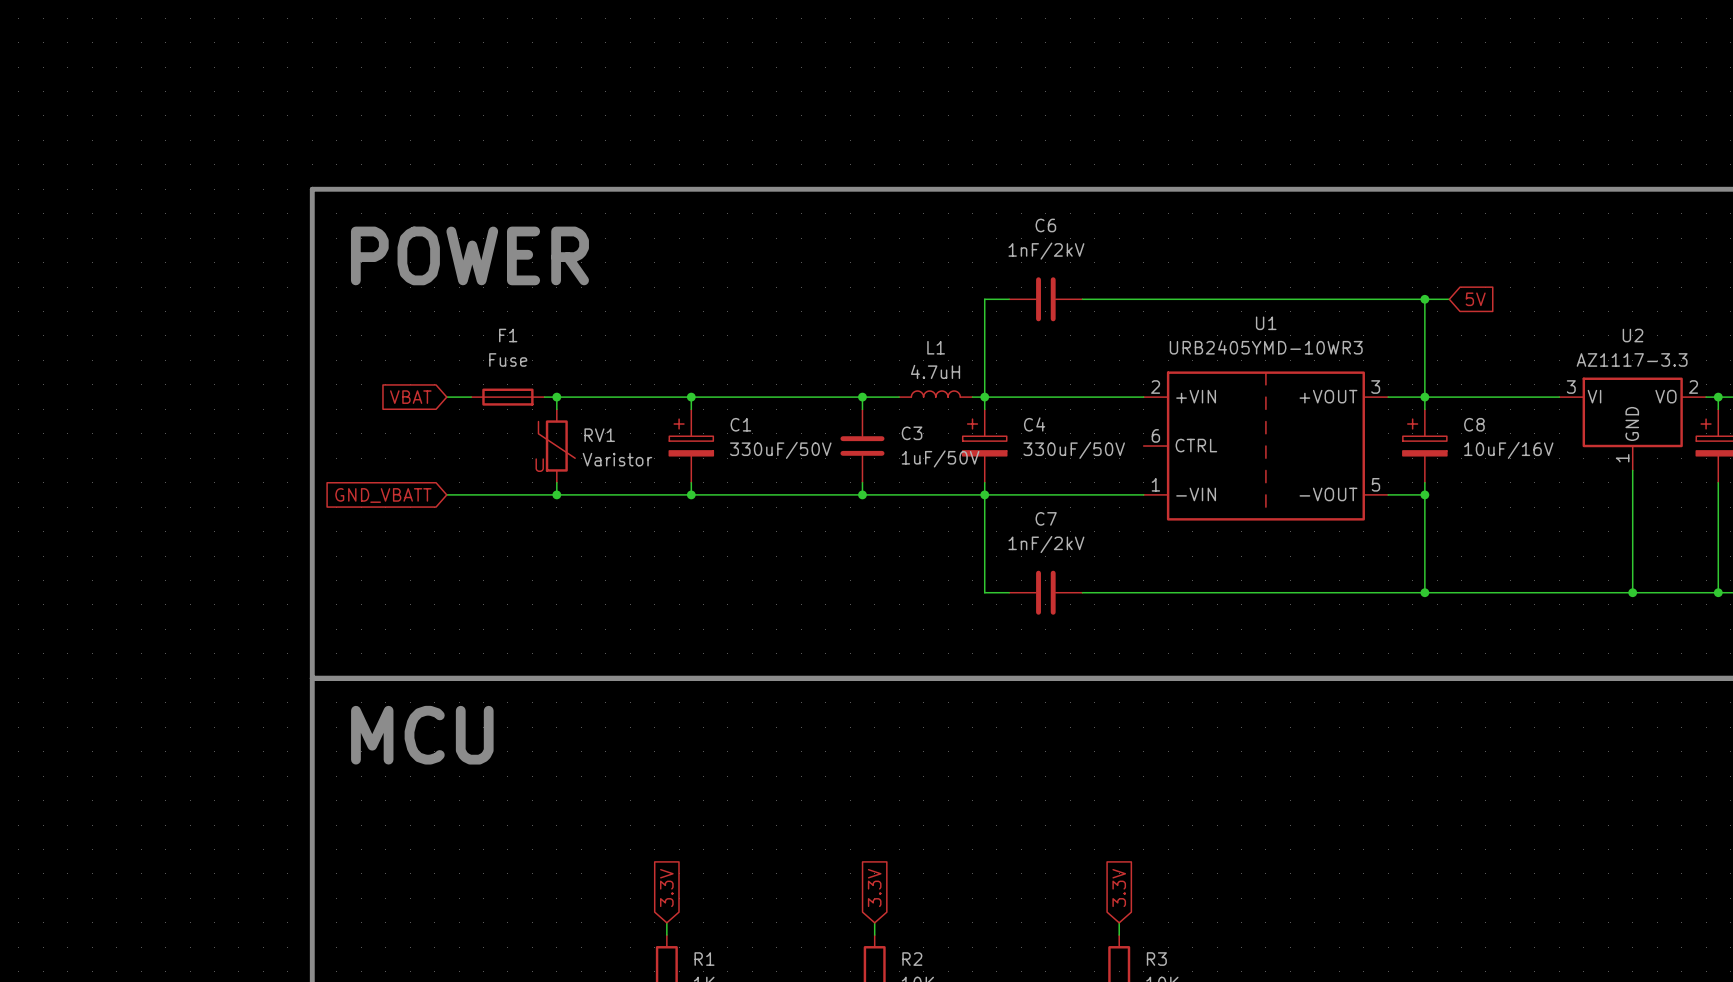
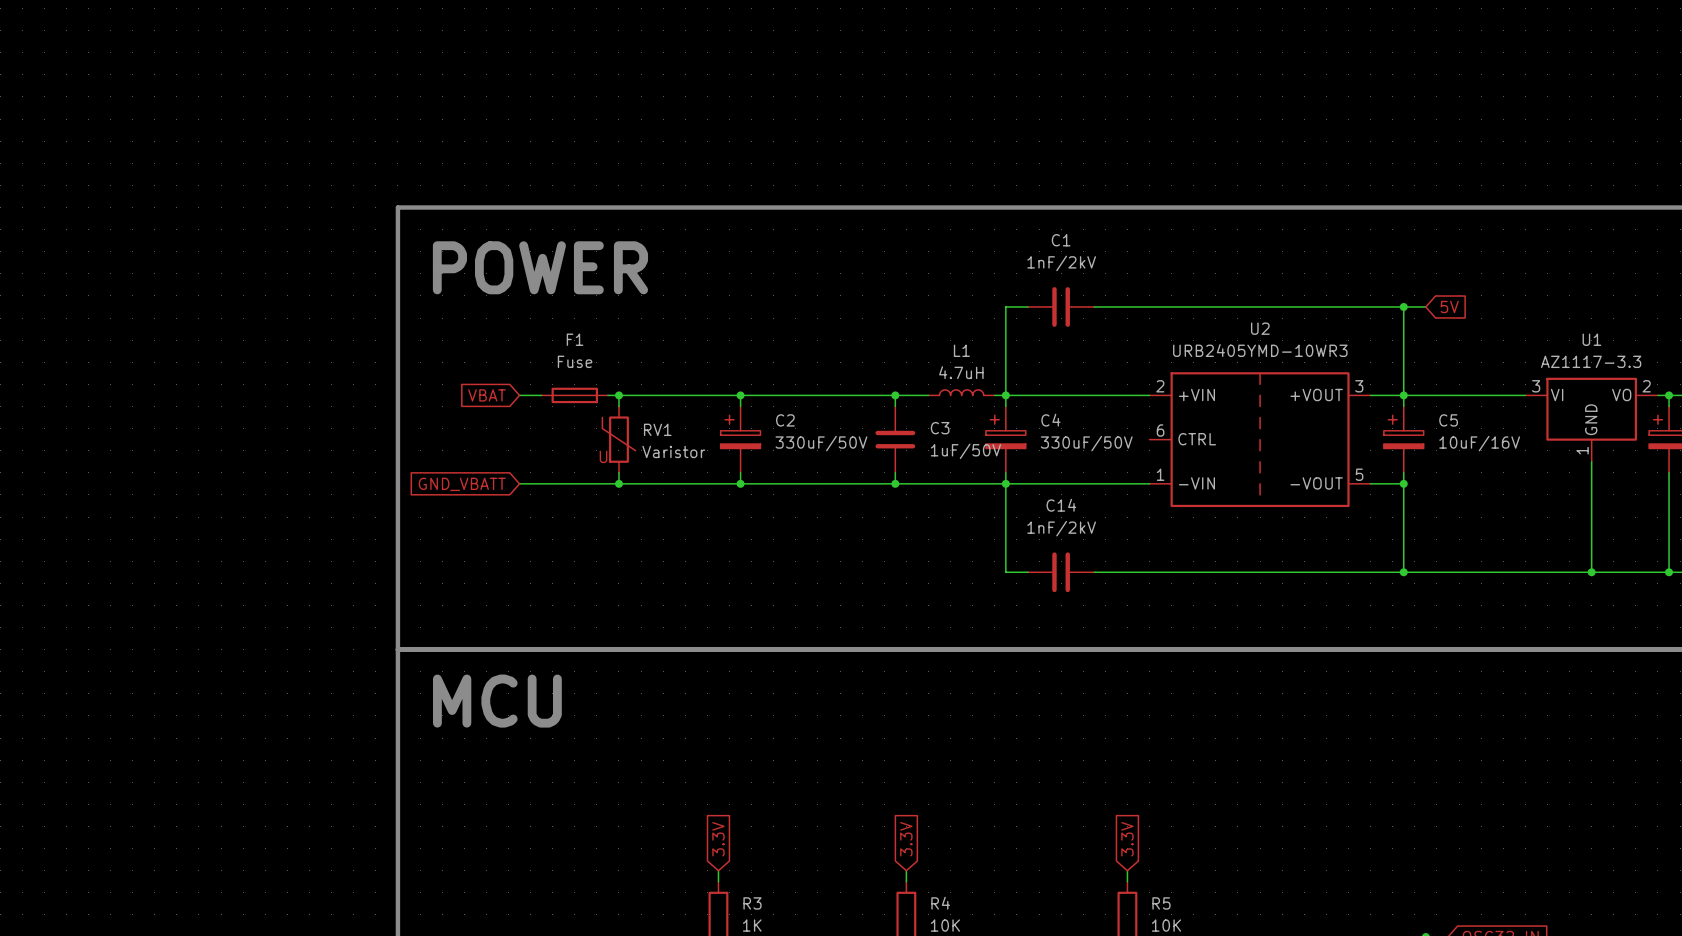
C6 name: C6 (1045, 225) -> C1 (1061, 240)
U1 name: U1 (1266, 323) -> U2 (1260, 328)
U2 name: U2 (1633, 335) -> U1 (1591, 339)
C1 name: C1 (740, 424) -> C2 (785, 420)
C8 name: C8 (1474, 424) -> C5 (1448, 420)
C7 name: C7 (1046, 518) -> C14 (1061, 505)
R1 name: R1 (704, 959) -> R3 (752, 903)
R2 name: R2 (912, 959) -> R4 (940, 903)
R3 name: R3 (1156, 959) -> R5 (1161, 903)

